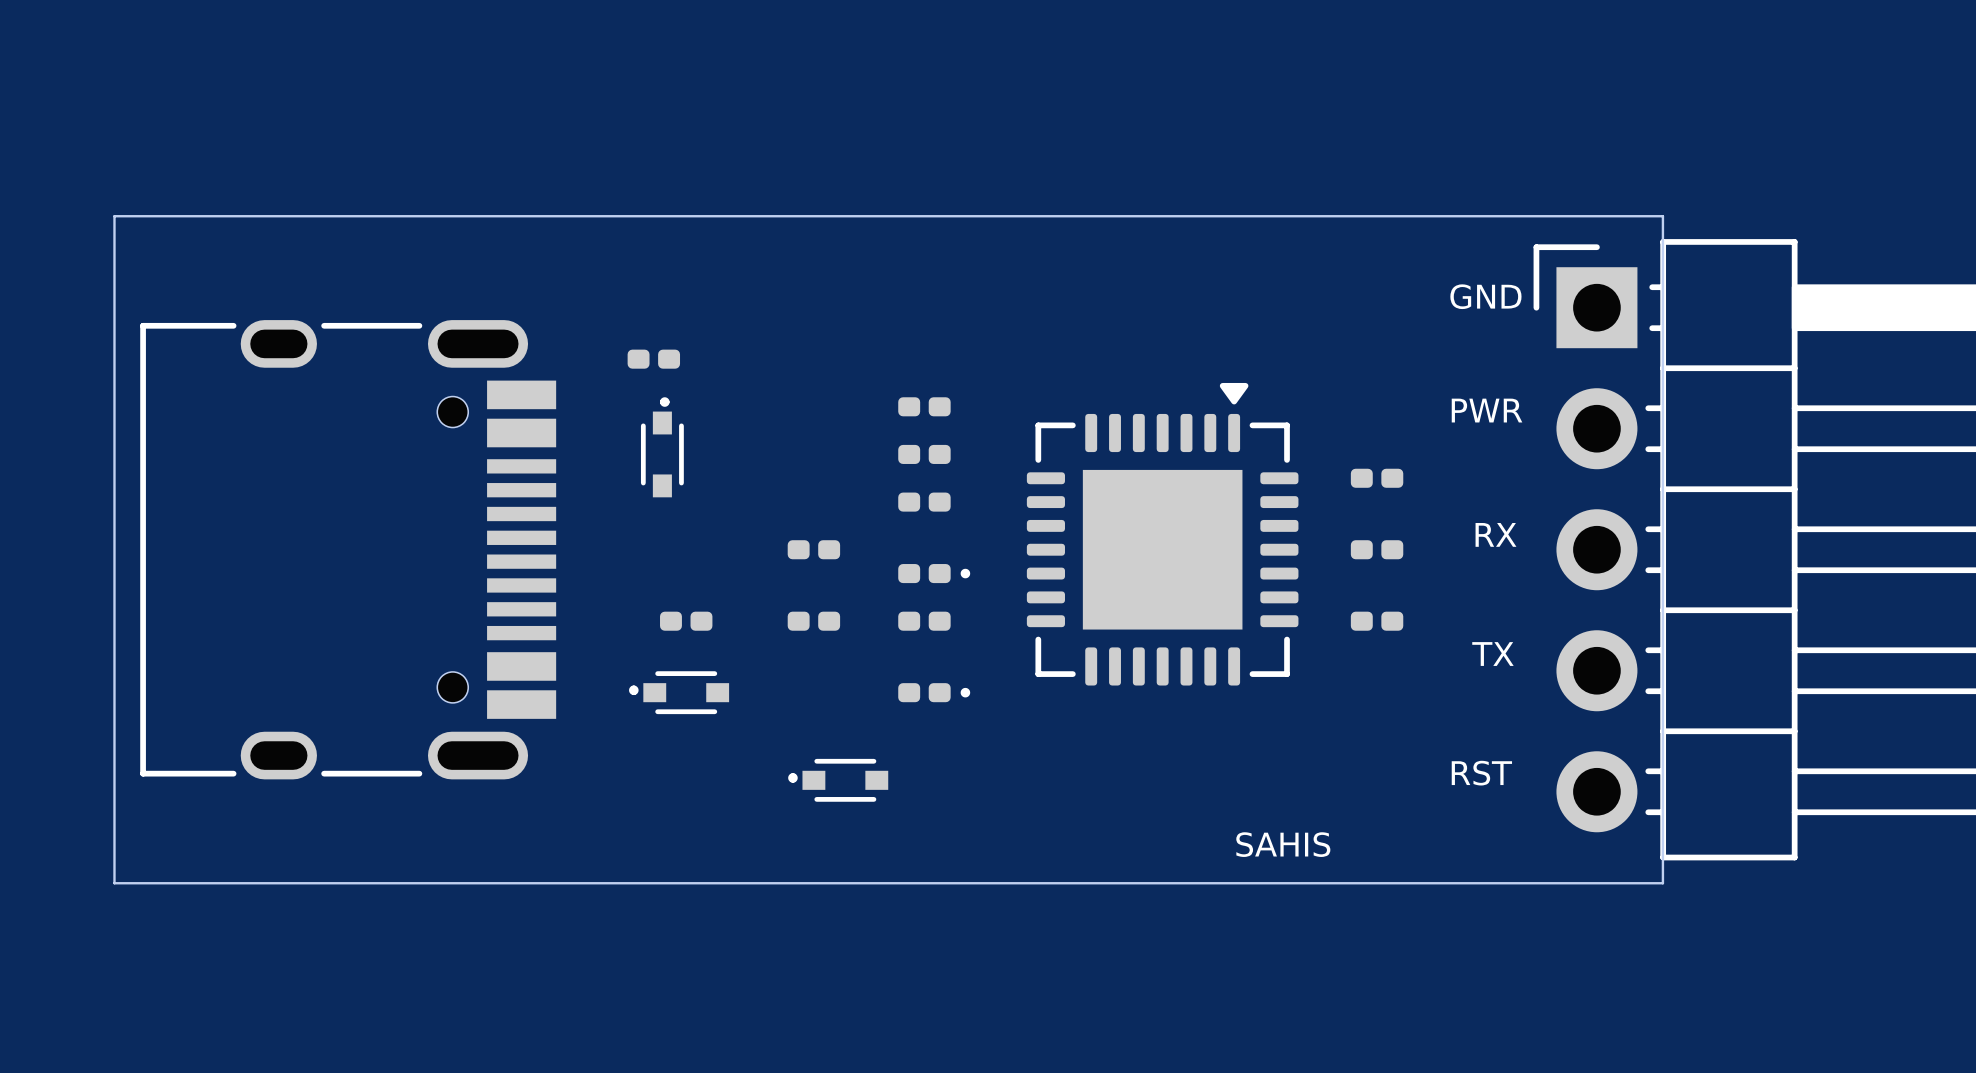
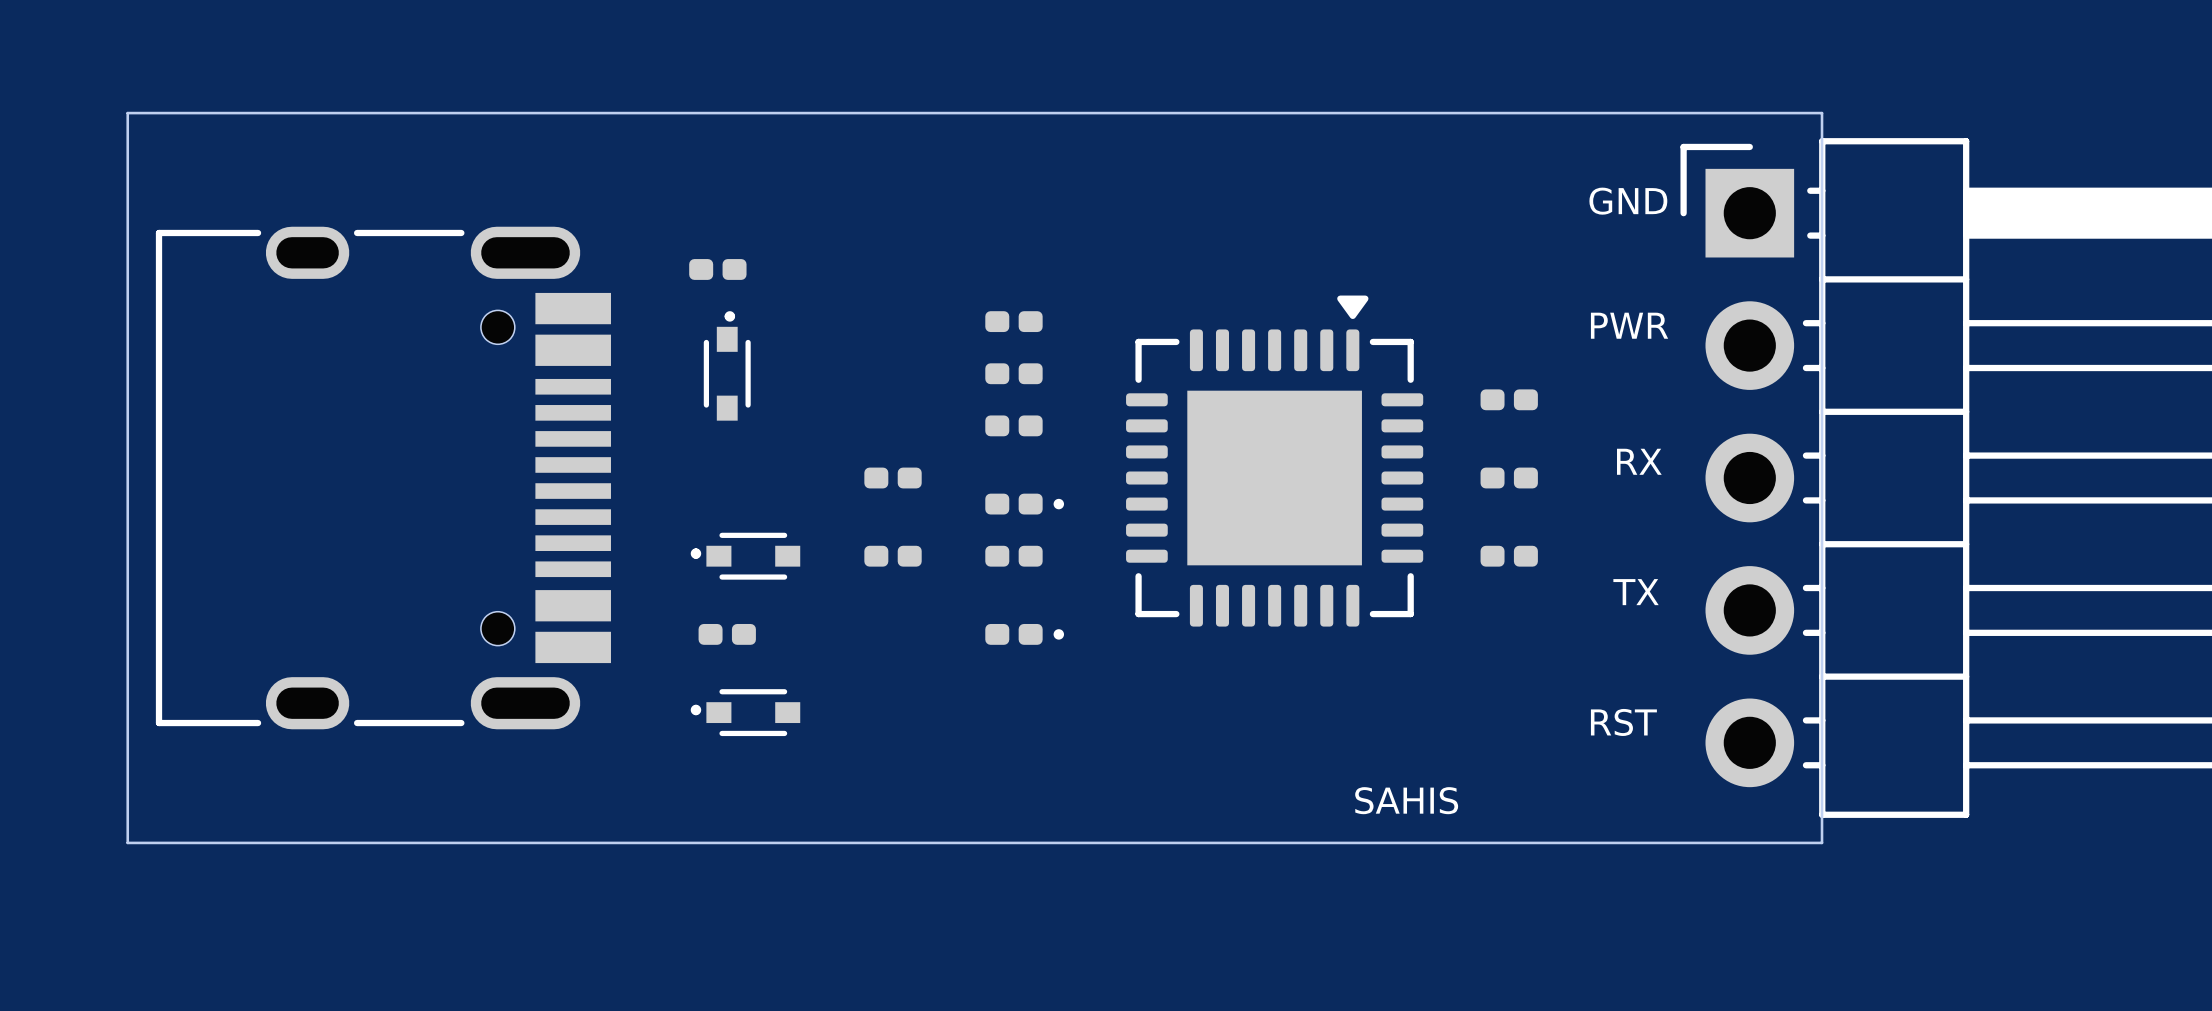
part footprint: [660, 611, 713, 631] -> [690, 532, 801, 580]
part footprint: [629, 671, 730, 715] -> [698, 623, 756, 645]
part position: (838, 780) -> (745, 712)

